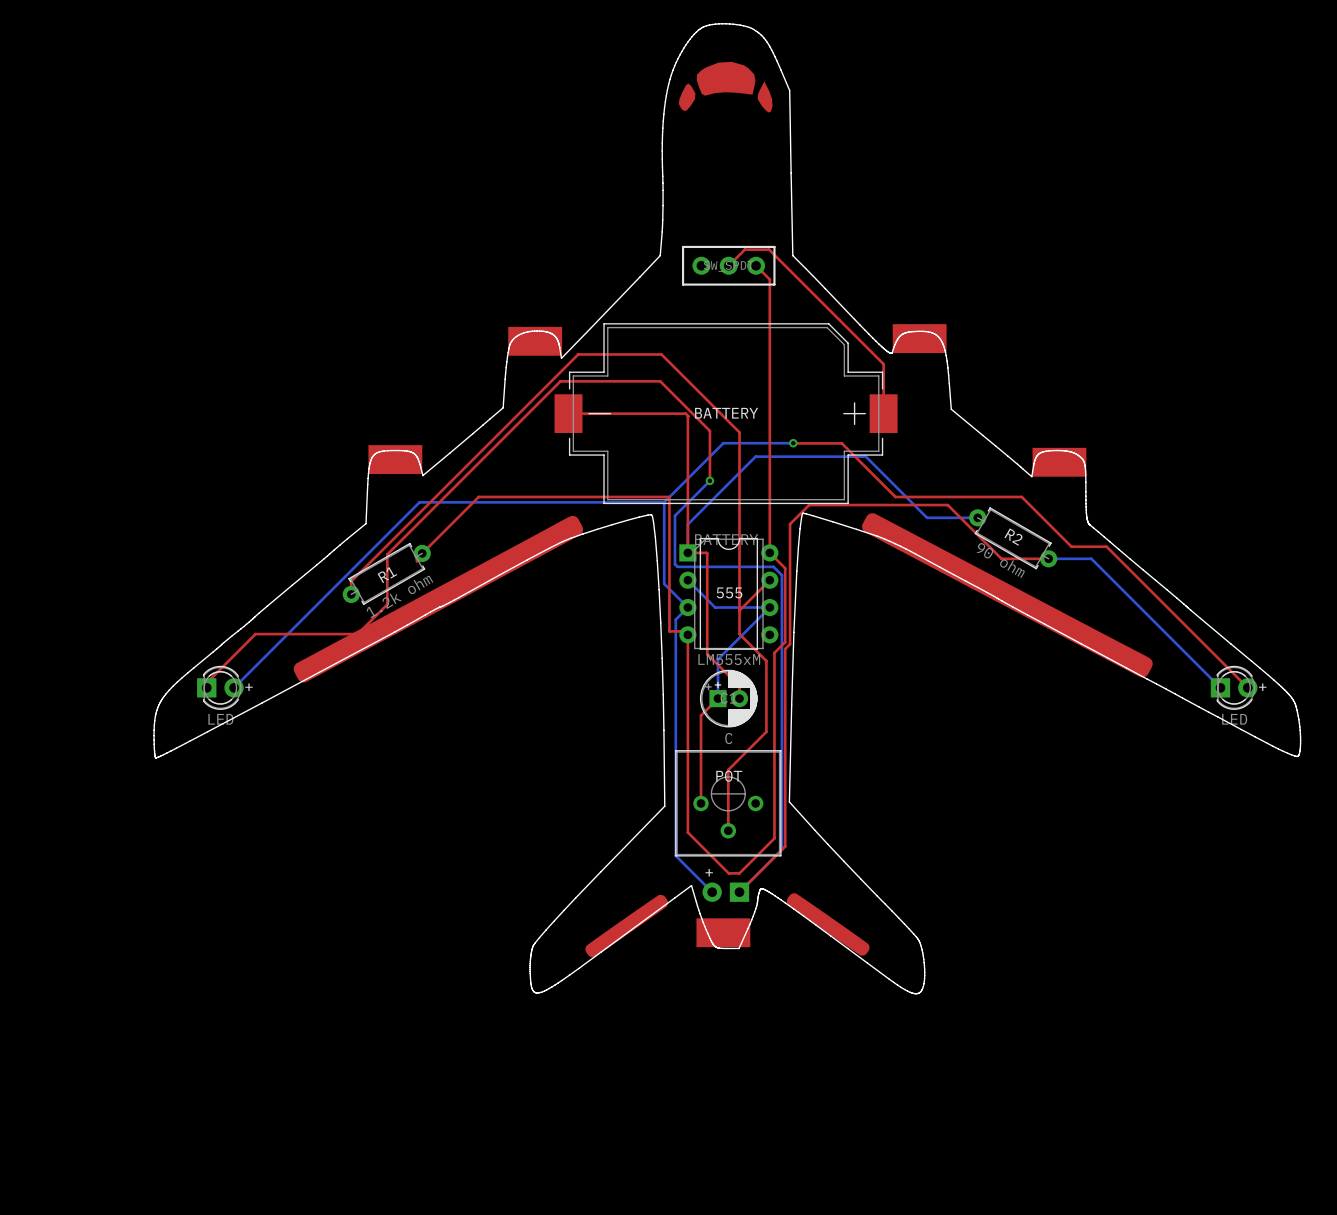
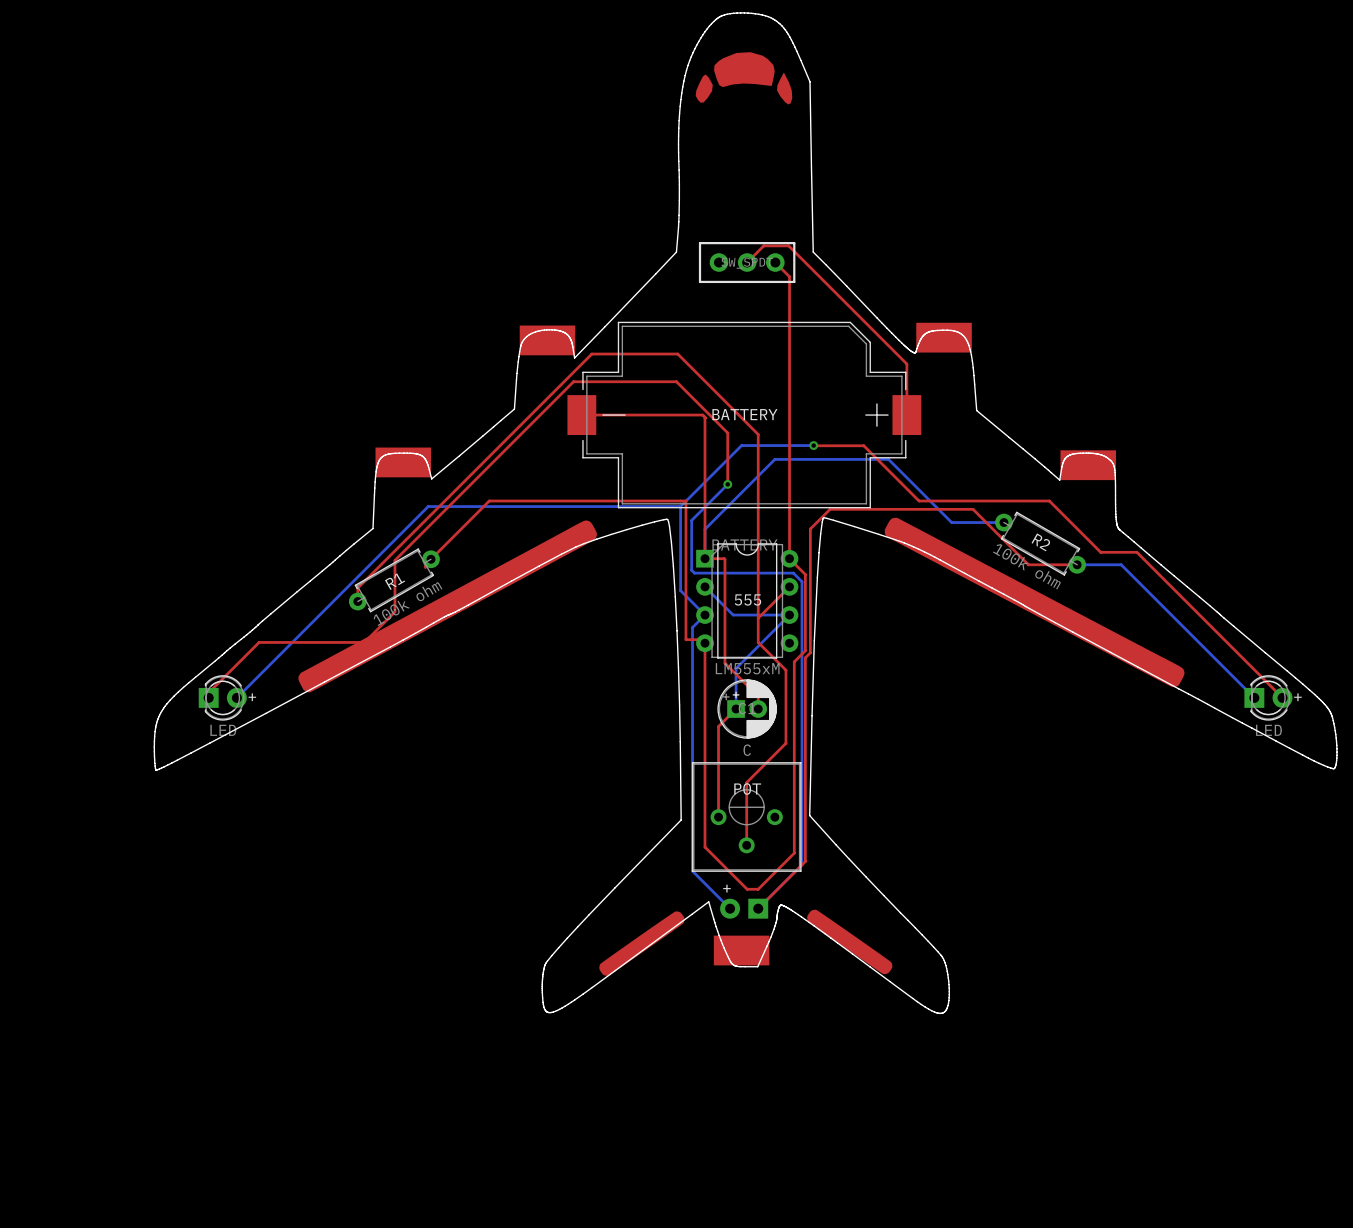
R2 value: 90 ohm (1000, 560) -> 100k ohm (1026, 566)
R1 value: 1.2k ohm (399, 596) -> 100k ohm (408, 604)

